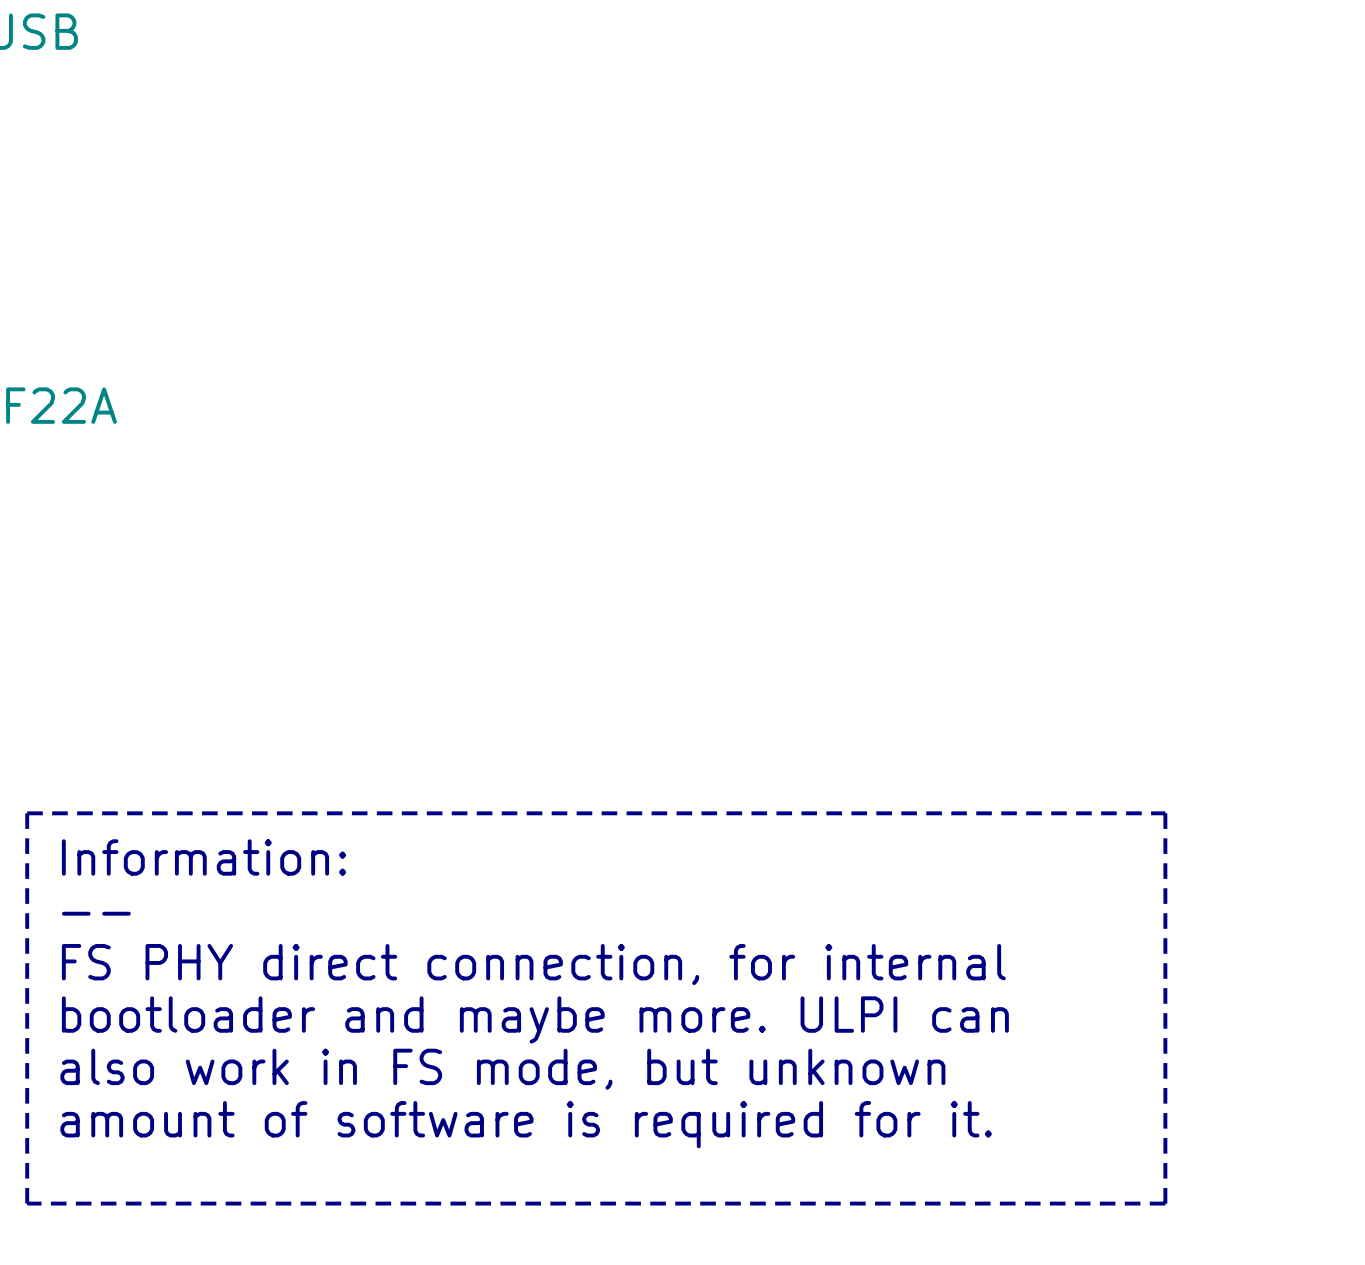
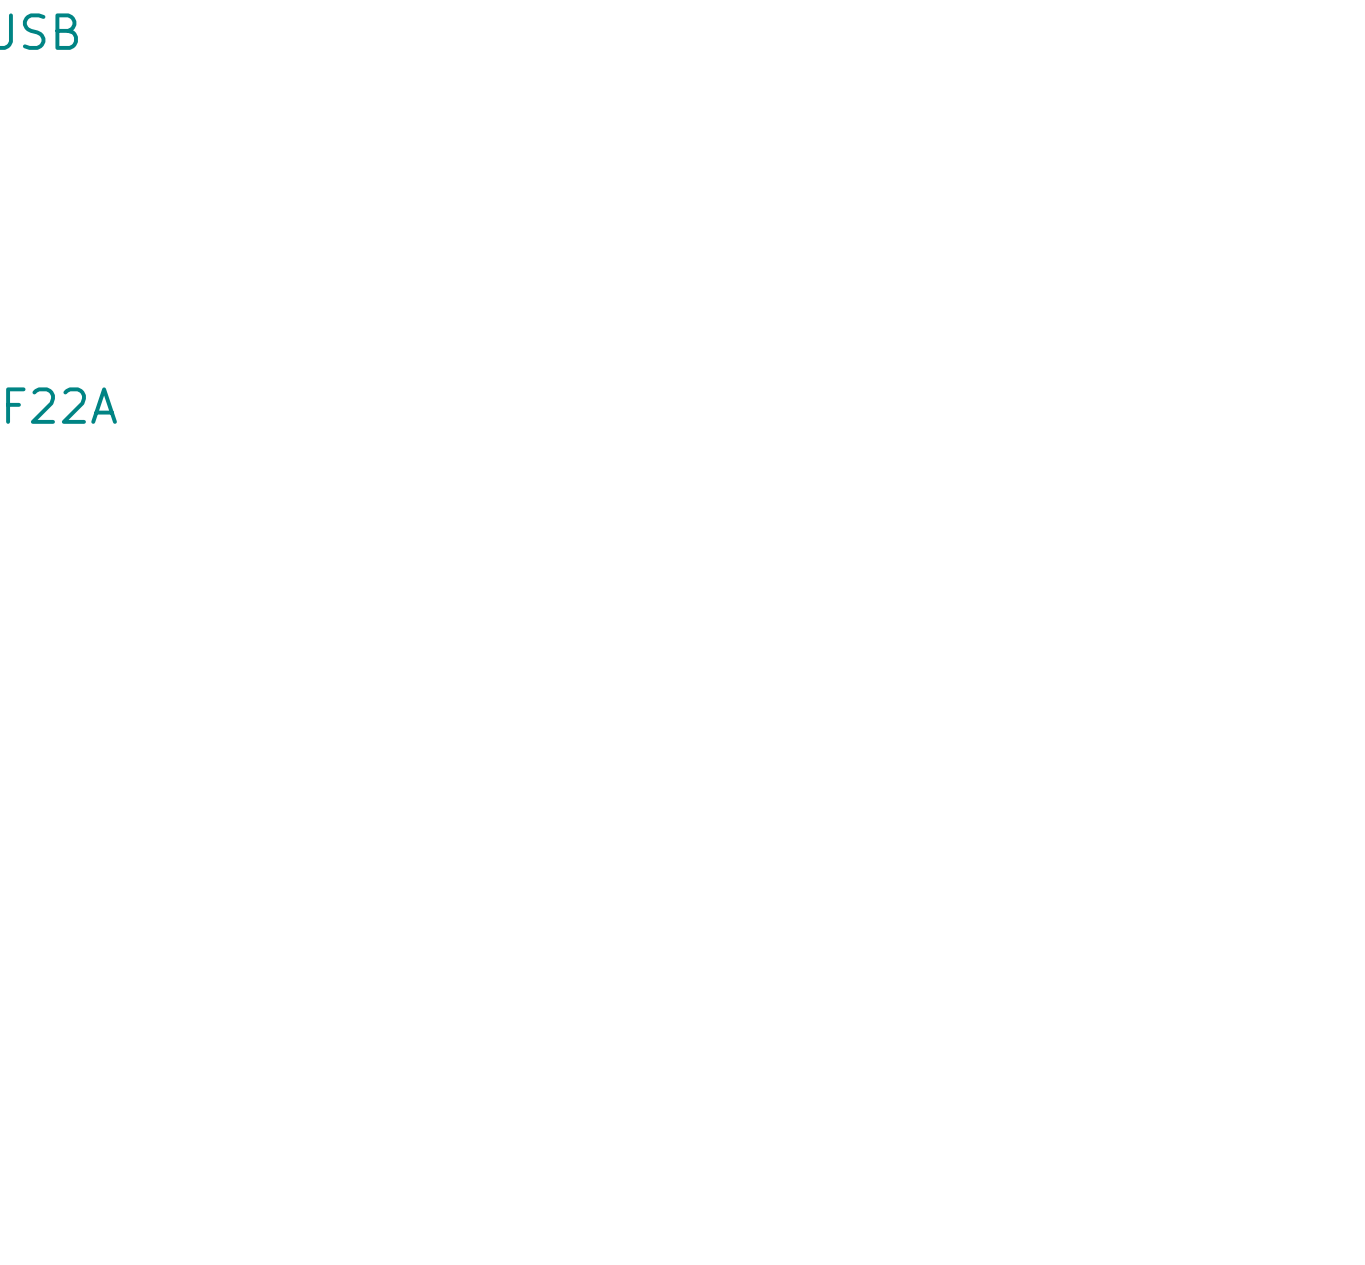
line: (27, 813) (1165, 813) (1165, 1203) (27, 1203) (27, 813) -> none
text: Information: (203, 857) -> none
text: -- (96, 913) -> none
text: FS PHY direct connection, for internal (533, 964) -> none
text: bootloader and maybe more. ULPI can (535, 1019) -> none
text: also work in FS mode, but unknown (502, 1069) -> none
text: amount of software is required for it. (526, 1124) -> none

